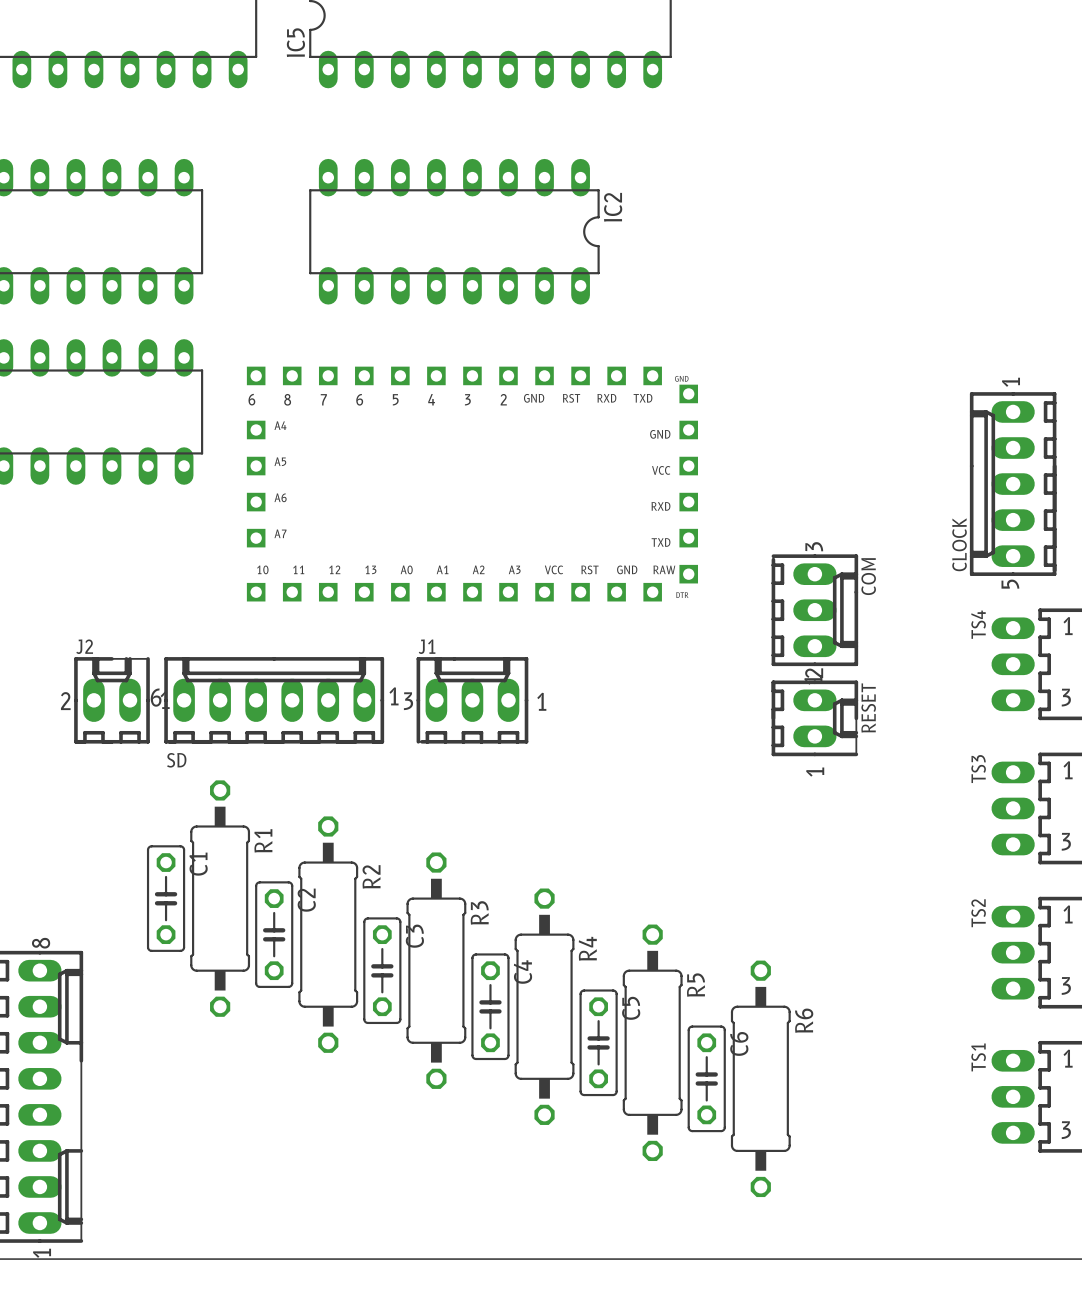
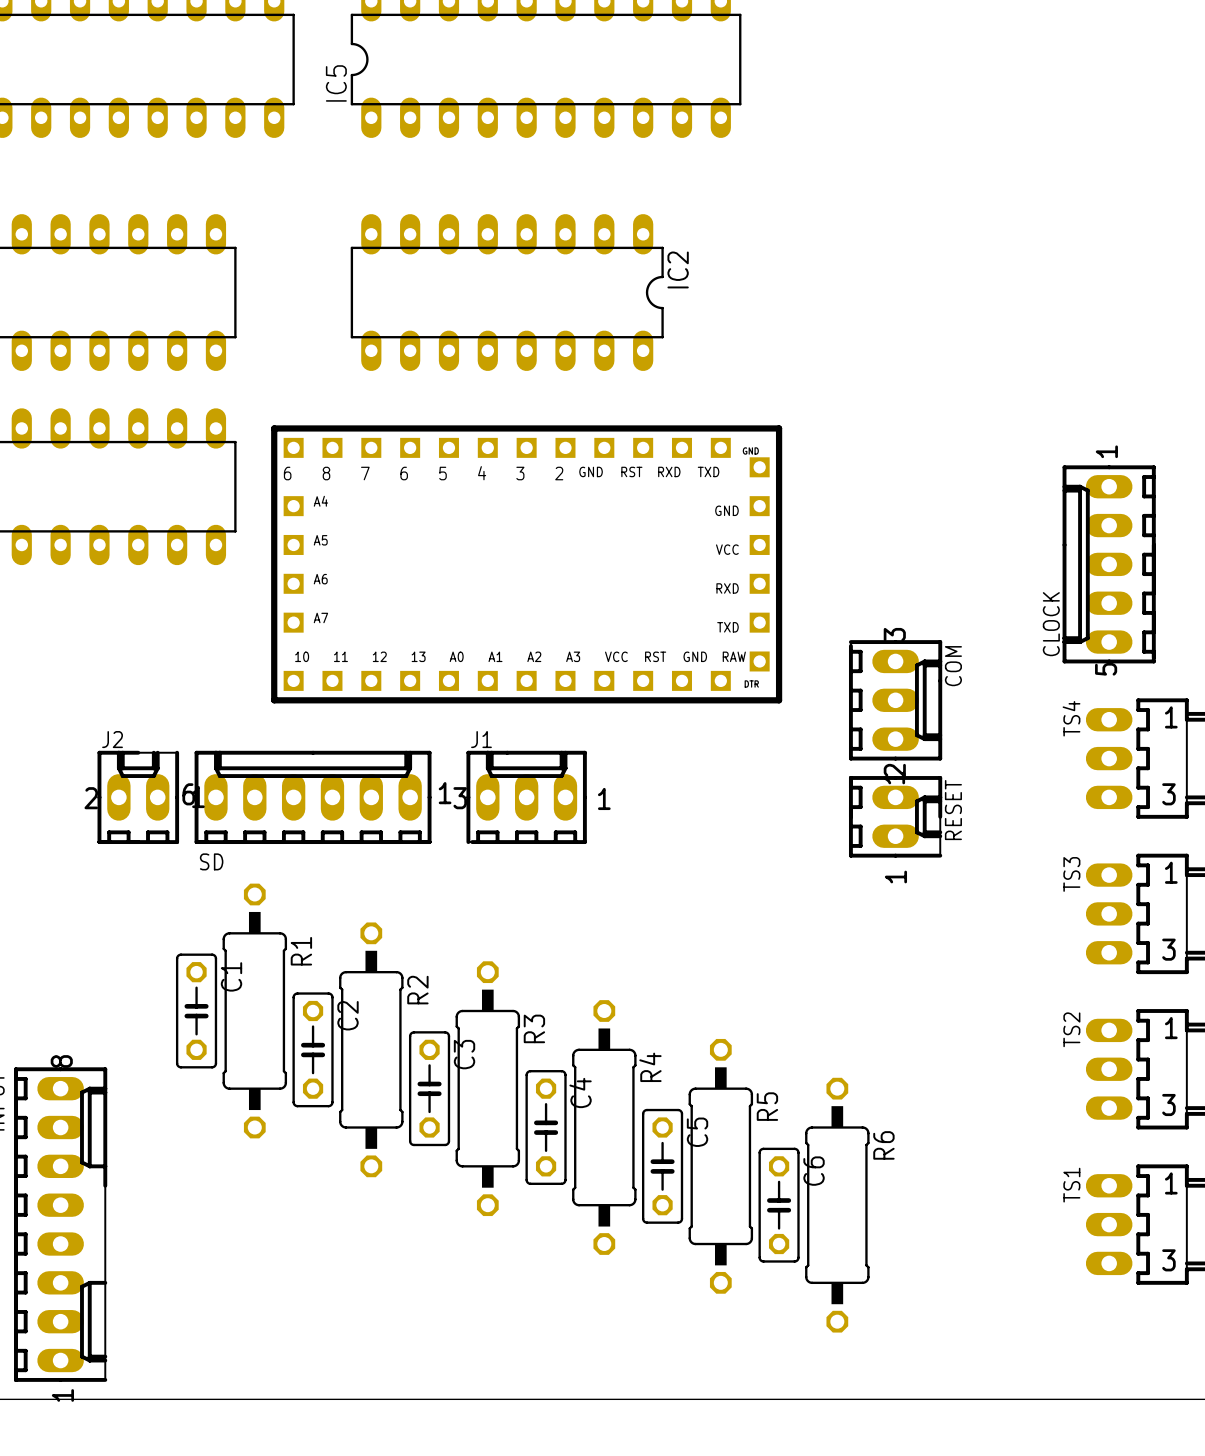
line: none -> (274, 428) (779, 428) (779, 700) (274, 700) (274, 428)

